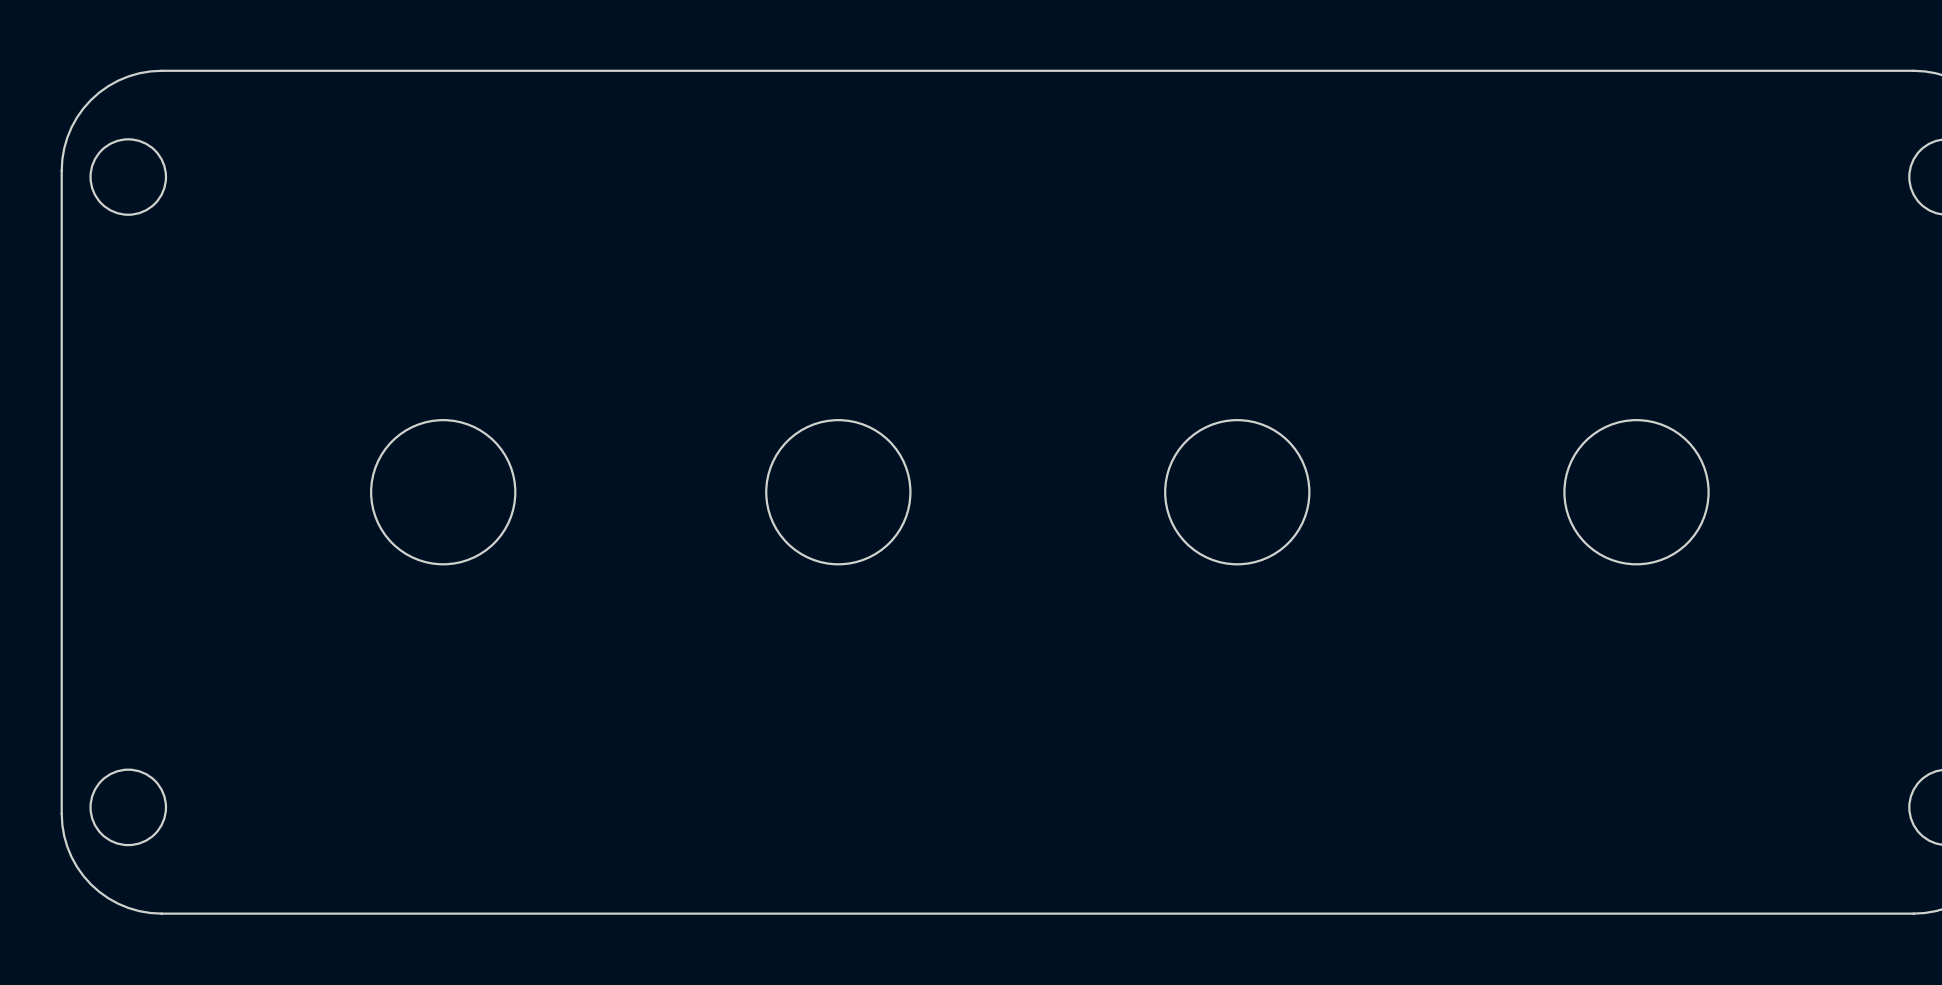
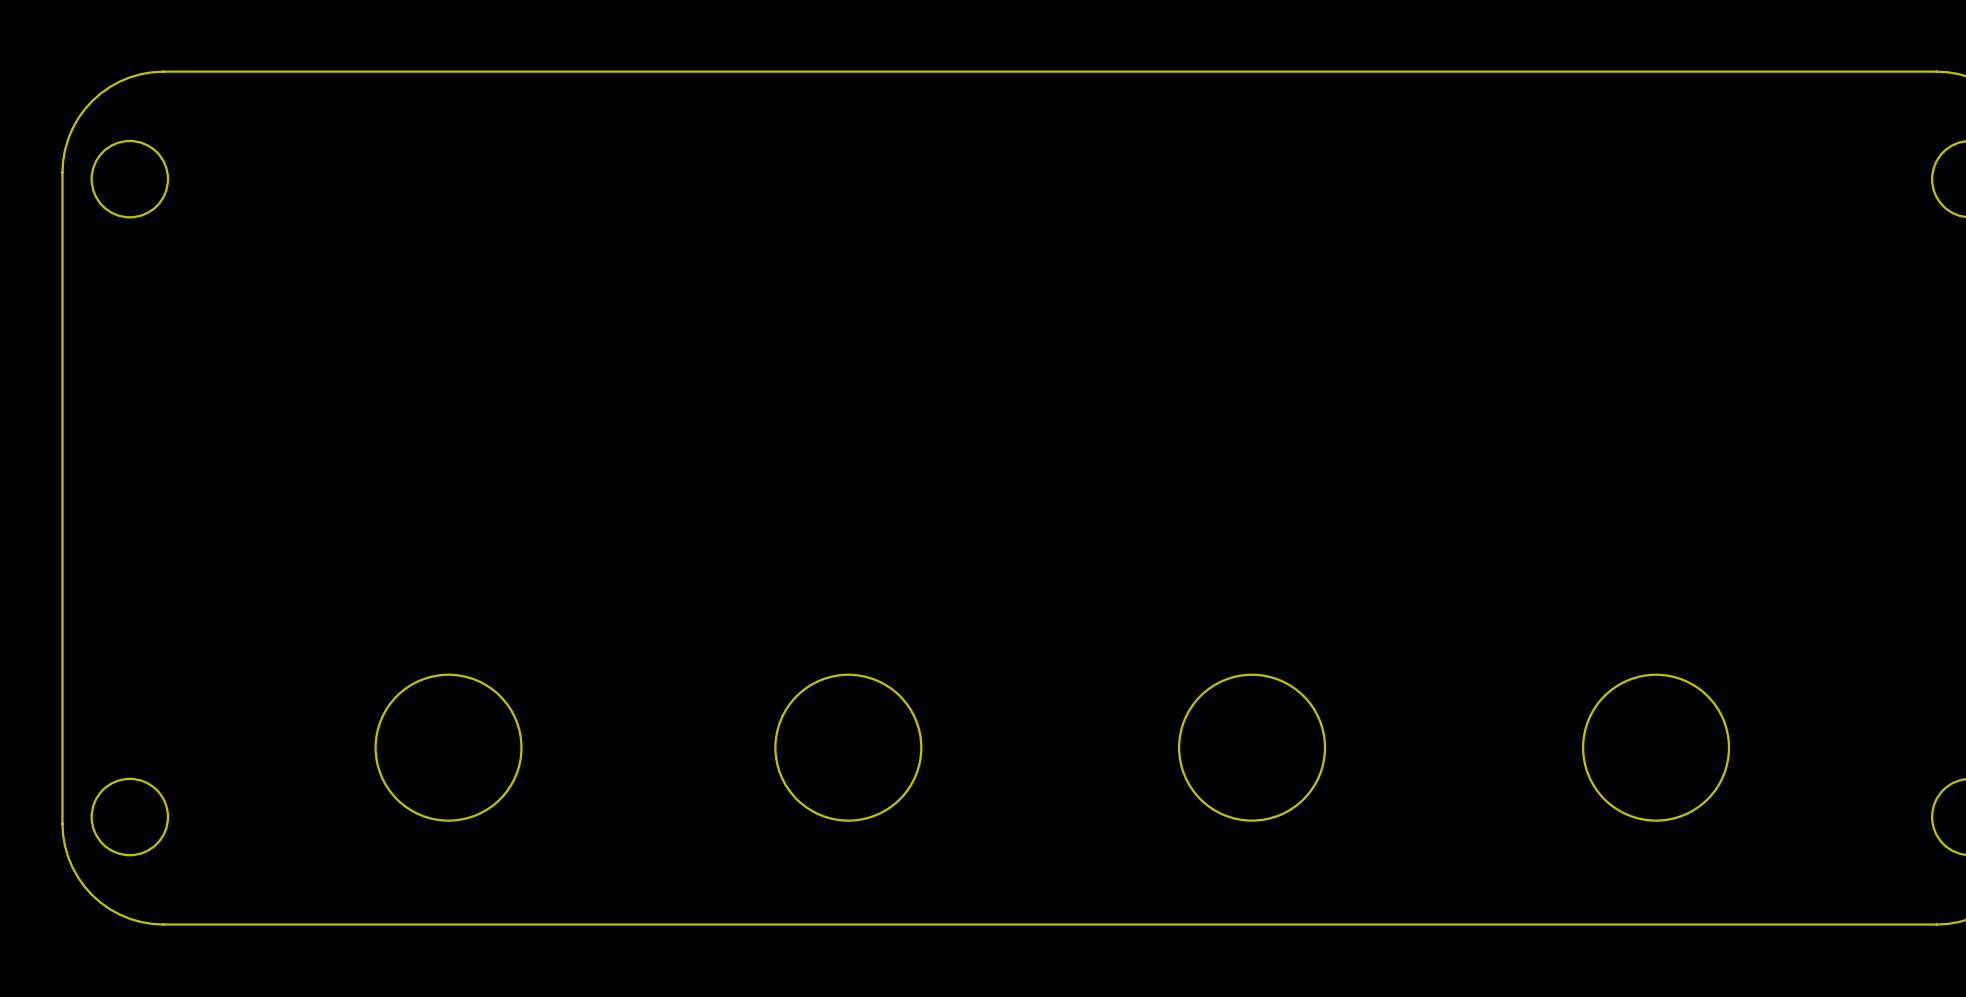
round board edge: [370, 419, 517, 566] -> none
round board edge: [765, 419, 912, 566] -> none
round board edge: [1164, 419, 1311, 566] -> none
round board edge: [1563, 419, 1710, 566] -> none
round board edge: none -> [374, 673, 523, 822]
round board edge: none -> [774, 673, 923, 822]
round board edge: none -> [1177, 673, 1327, 822]
round board edge: none -> [1581, 673, 1731, 822]

